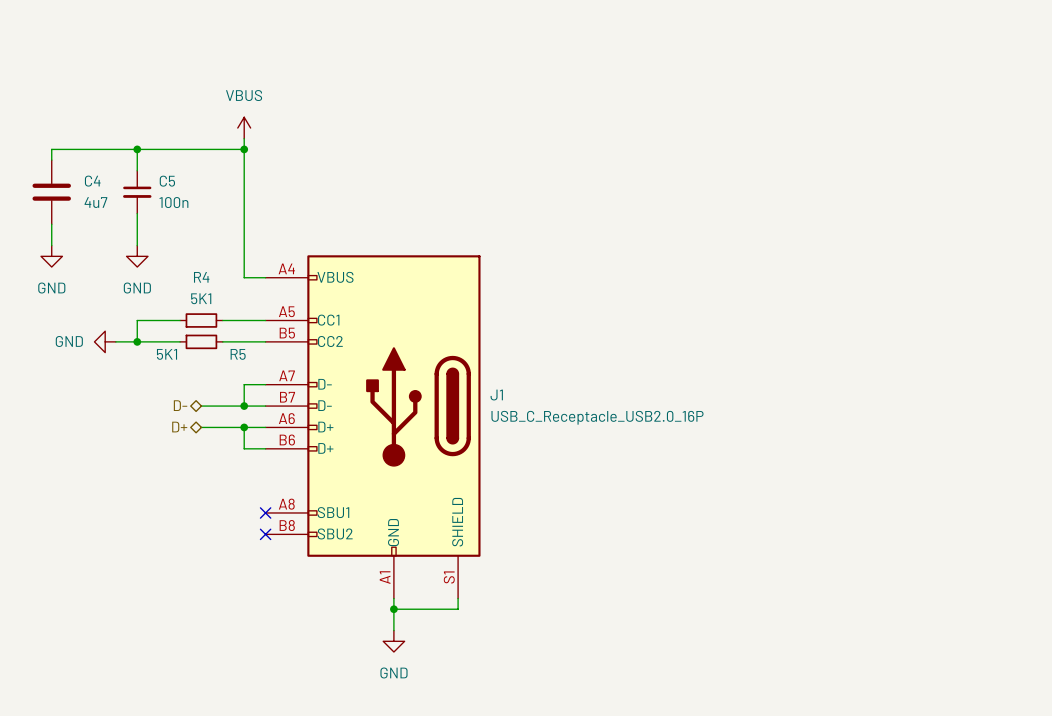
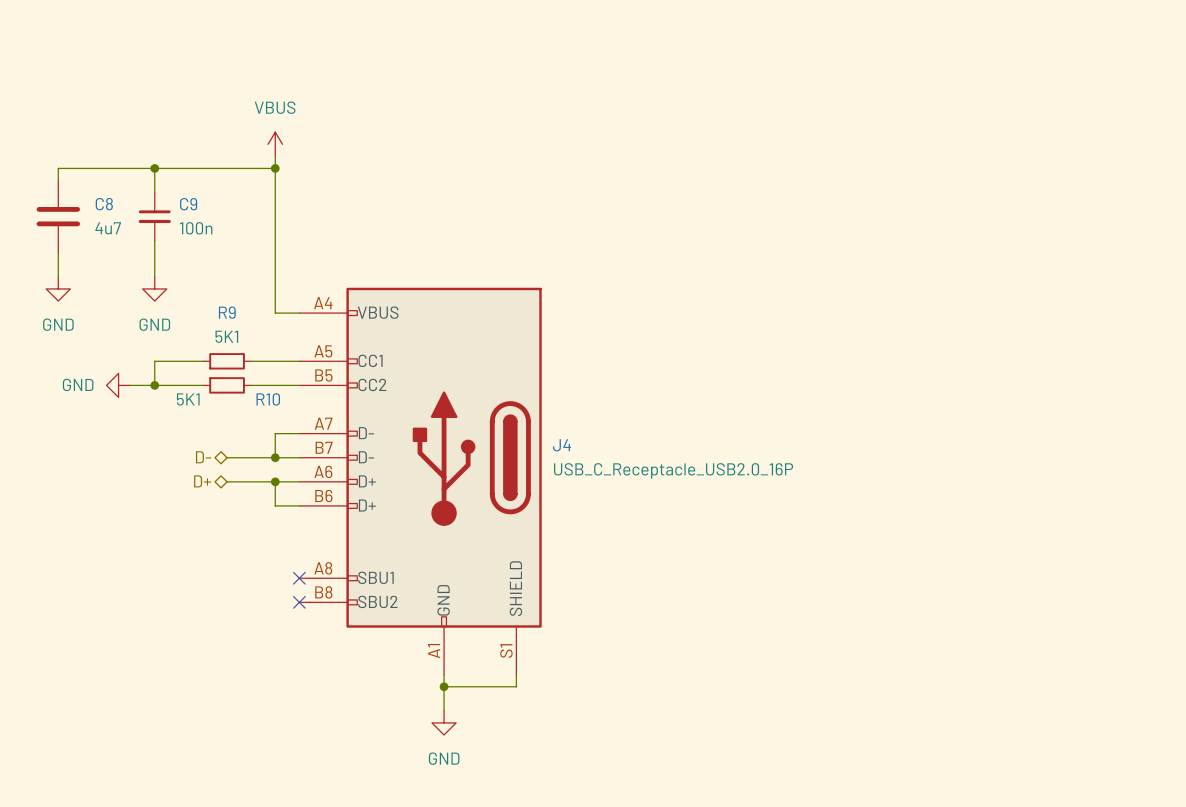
C4 name: C4 (92, 181) -> C8 (104, 204)
C5 name: C5 (167, 181) -> C9 (188, 204)
R4 name: R4 (201, 277) -> R9 (227, 312)
R5 name: R5 (238, 354) -> R10 (268, 399)
J1 name: J1 (496, 395) -> J4 (561, 445)

